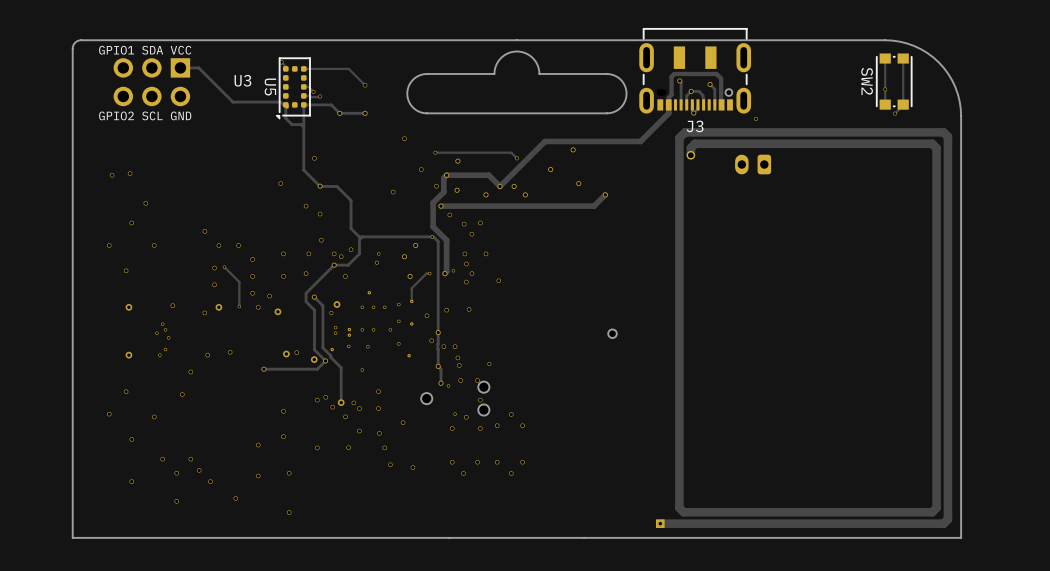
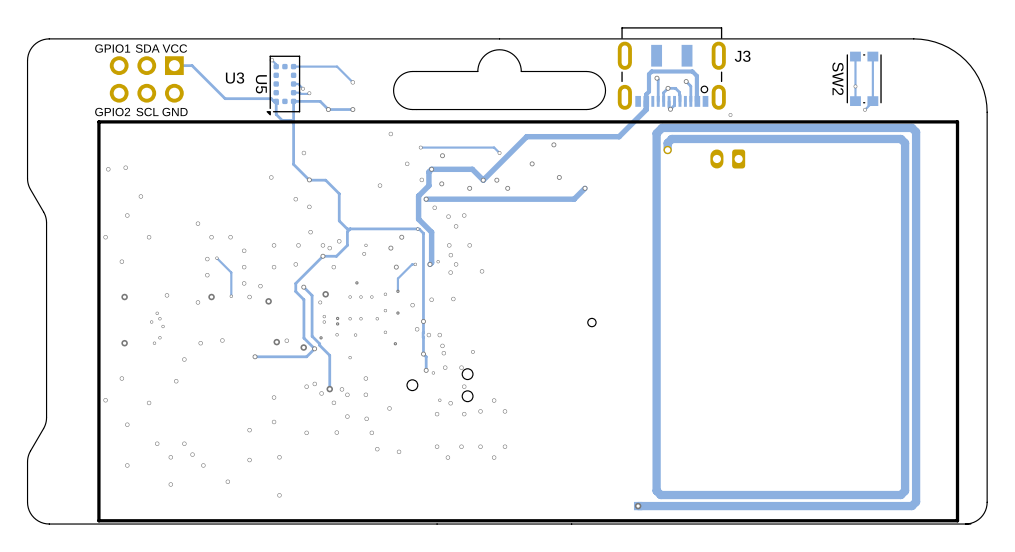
board edge: none -> (855, 38) (920, 39) (941, 44) (960, 55) (970, 65) (978, 77) (985, 97) (987, 502) (985, 510) (980, 517) (973, 522) (965, 524)
board edge: (885, 40) (907, 43) (933, 57) (948, 73) (959, 101) (961, 537) (72, 537) (72, 48) (75, 42) (81, 40) -> (970, 524) (49, 524) (38, 521) (32, 515) (27, 505) (27, 461) (29, 452) (44, 426) (46, 419) (46, 222) (44, 213) (29, 187) (27, 180) (27, 57) (32, 47) (40, 40) (78, 38)
J3 name position: J3 (695, 126) -> J3 (742, 56)
line: none -> (957, 121) (98, 121) (98, 520) (957, 520) (957, 121)

